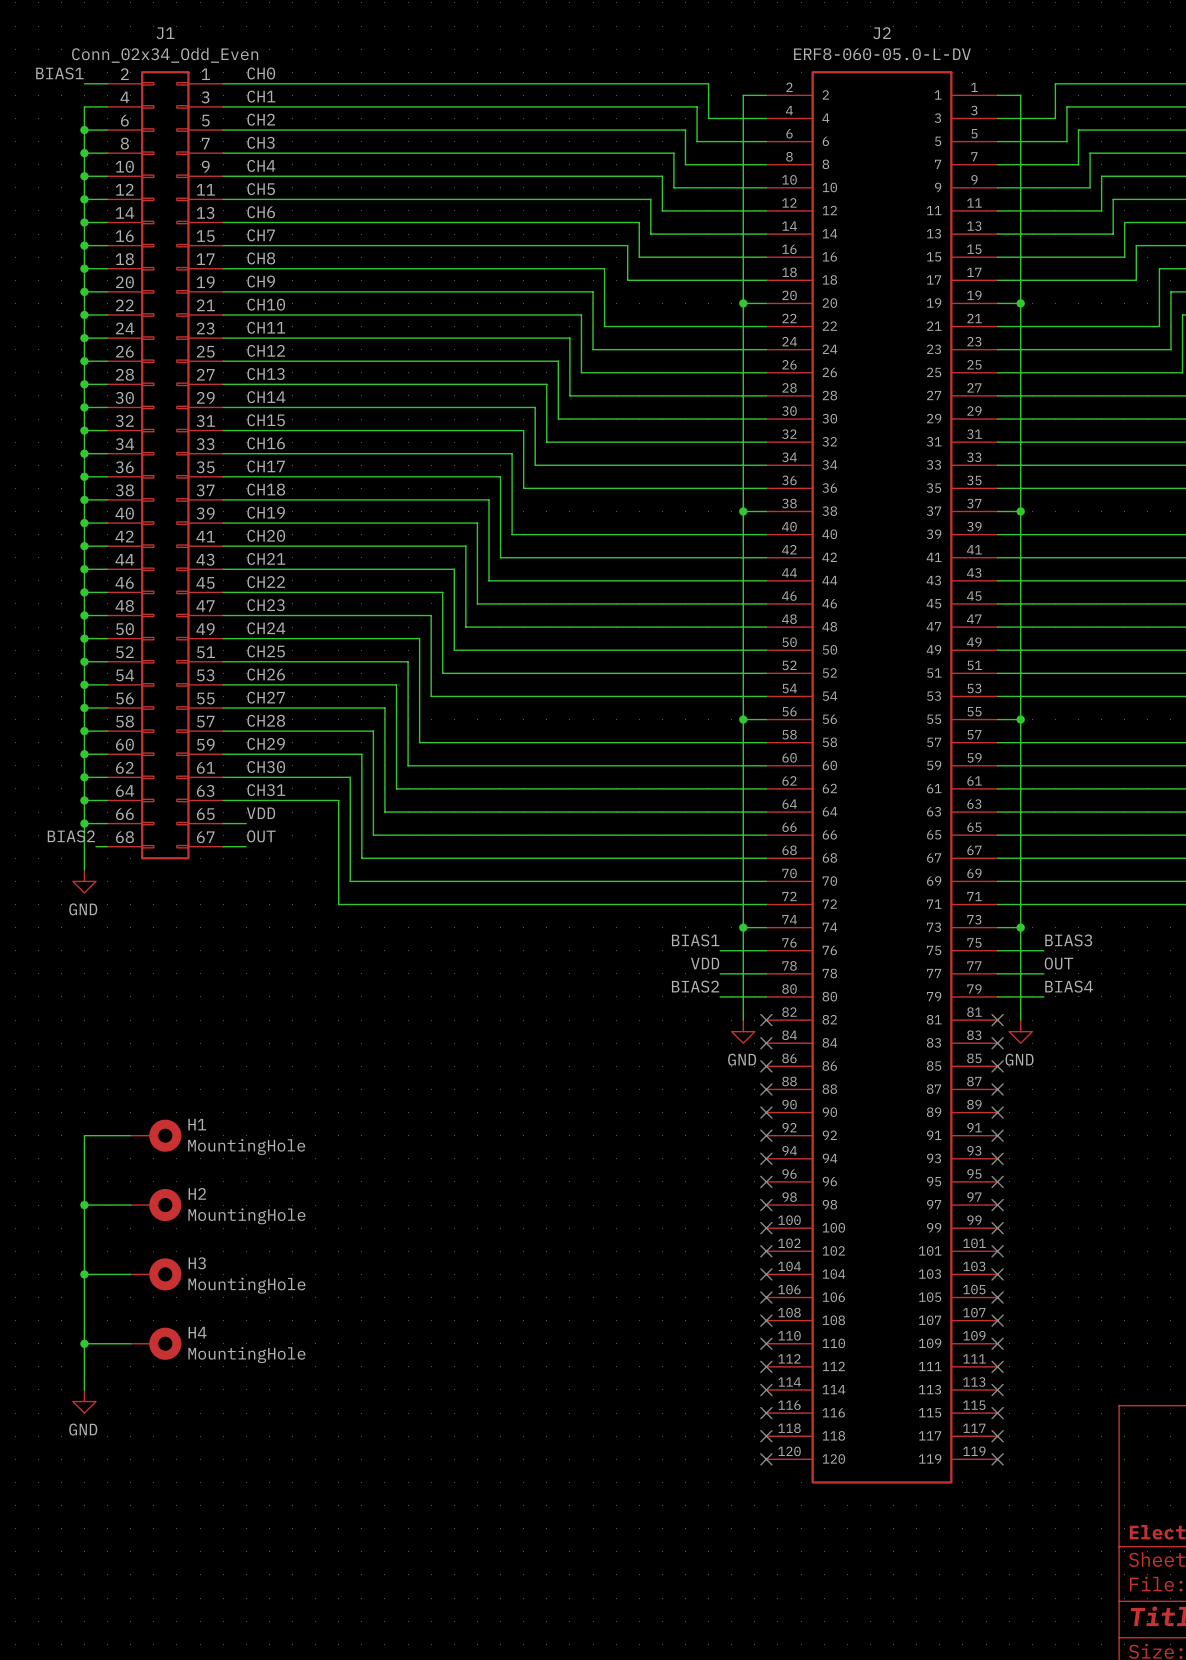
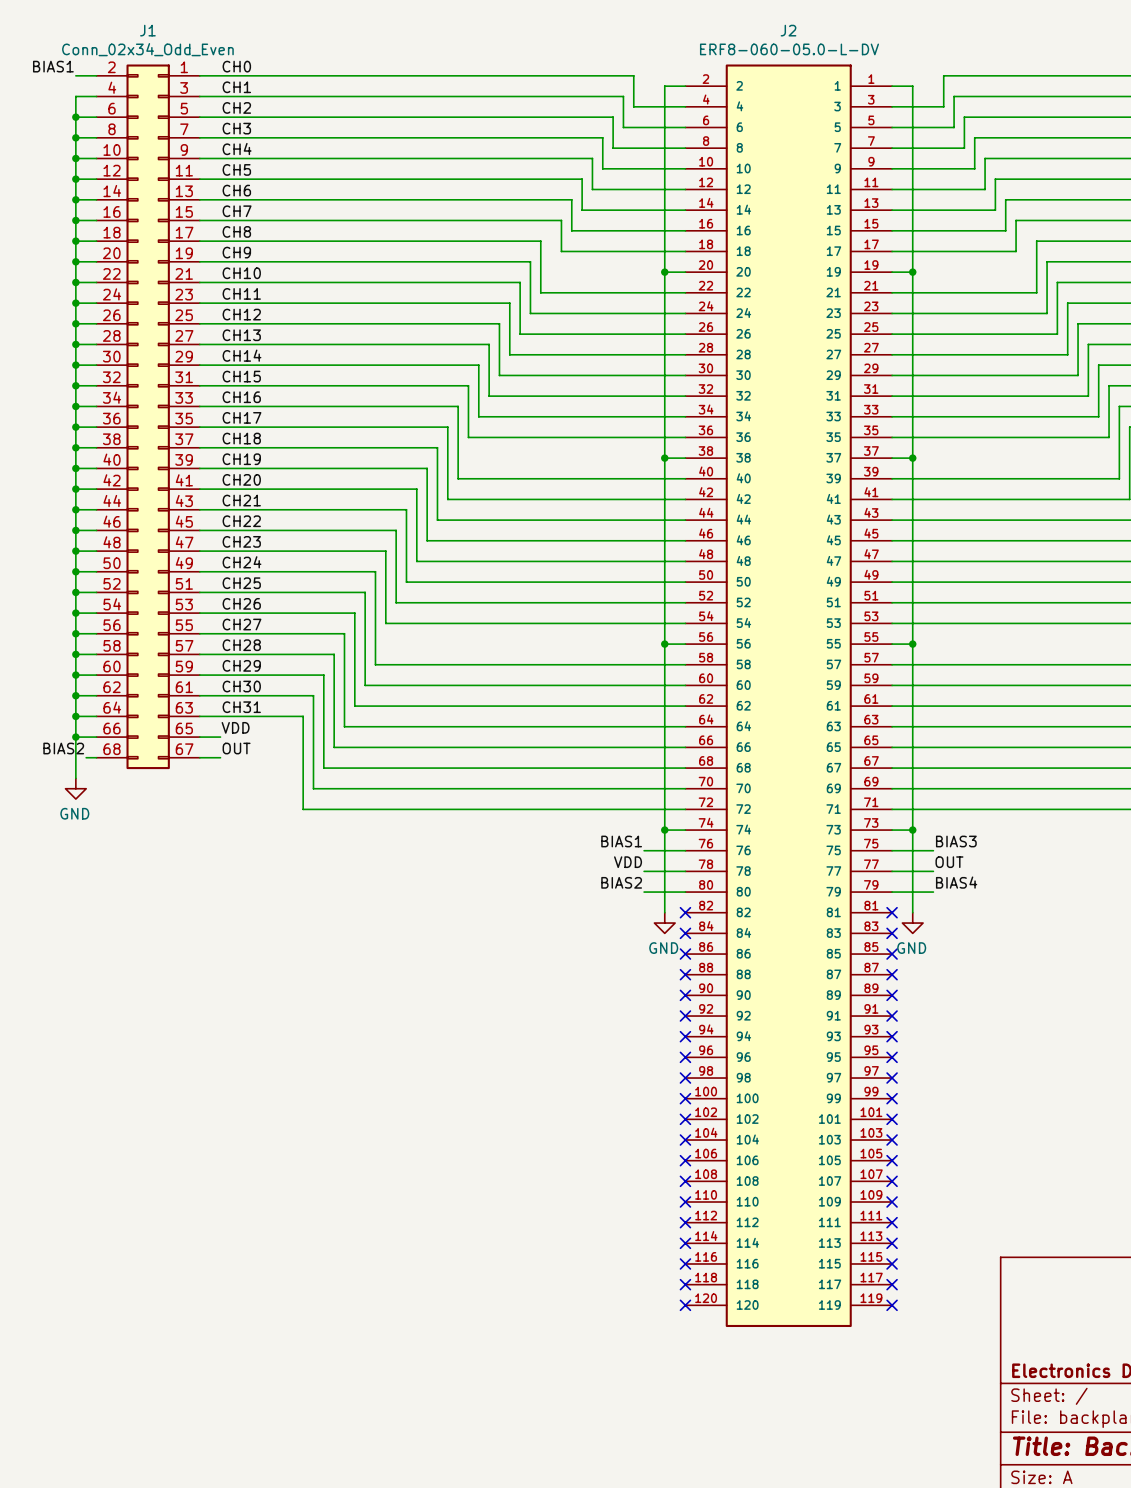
wire: (130, 1135) (84, 1135) (84, 1389) -> none
H1: MountingHole (156, 1135) -> none
wire: (84, 1205) (130, 1205) -> none
junction: (84, 1205) -> none
H2: MountingHole (156, 1205) -> none
wire: (84, 1274) (130, 1274) -> none
junction: (84, 1274) -> none
H3: MountingHole (156, 1274) -> none
wire: (84, 1343) (130, 1343) -> none
junction: (84, 1343) -> none
H4: MountingHole (156, 1343) -> none
power symbol: GND (84, 1401) -> none

